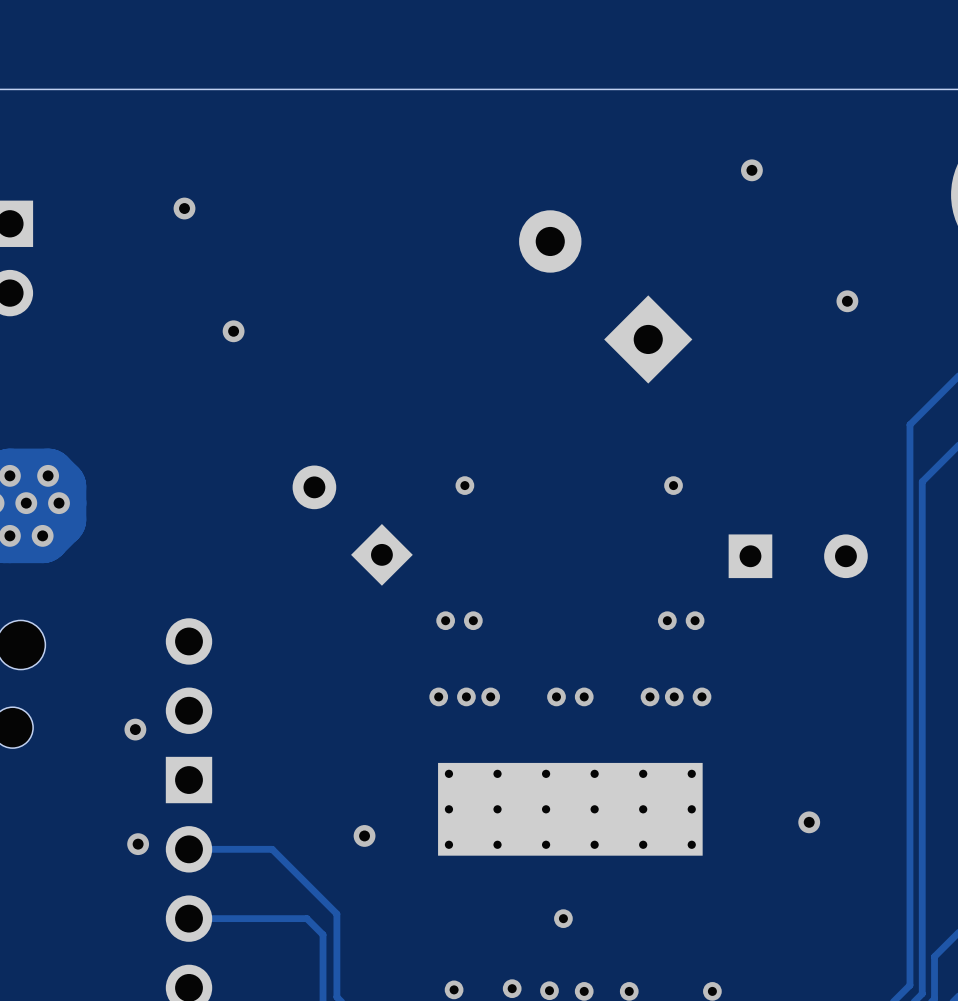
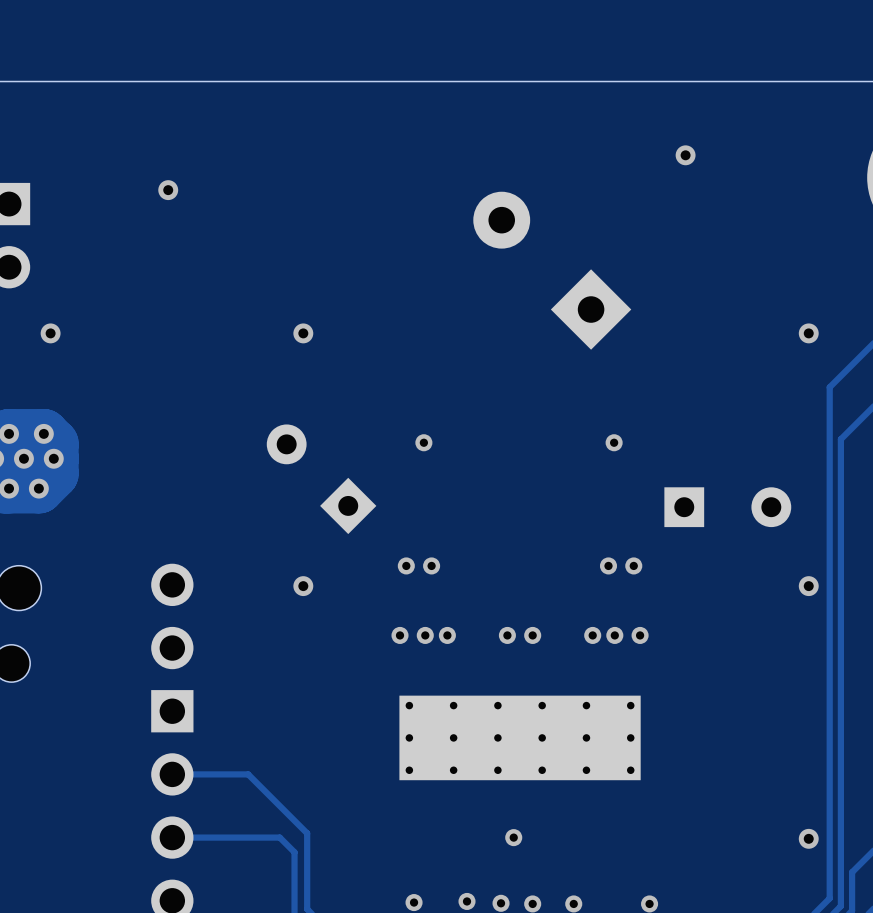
via position: (847, 301) -> (808, 333)
via: (233, 331) -> none
via: none -> (50, 333)
via: none -> (303, 333)
via: none -> (303, 586)
via: none -> (808, 586)
via: (135, 729) -> none
via: (809, 822) -> none
via: (364, 835) -> none
via: (138, 844) -> none
via: none -> (808, 838)

